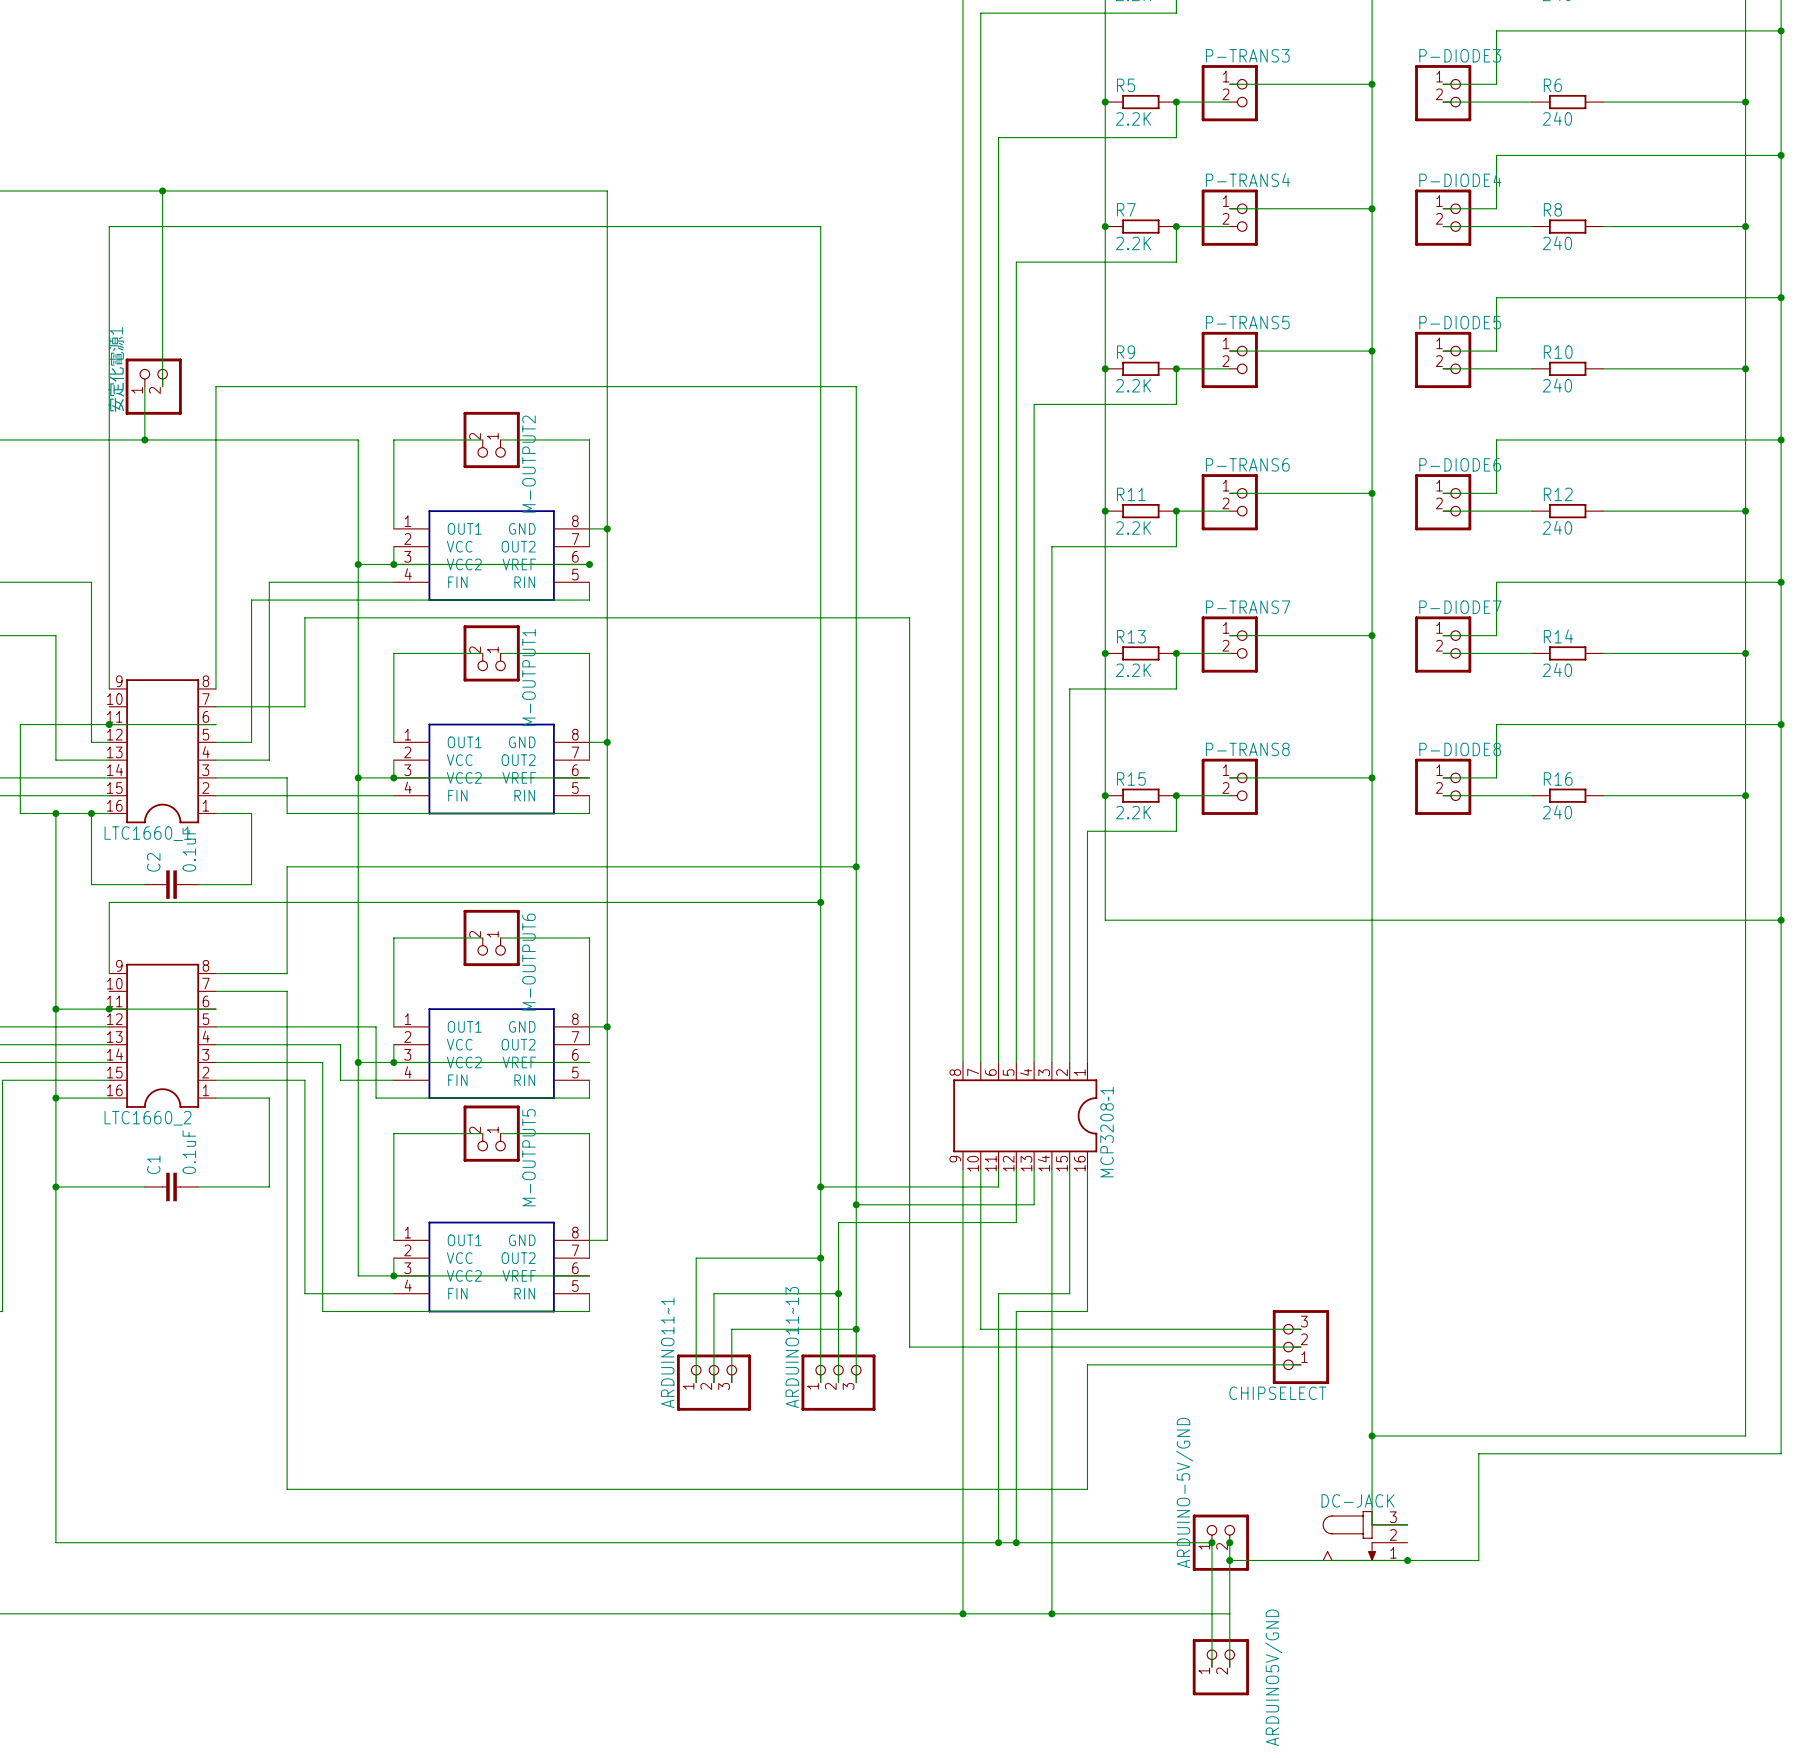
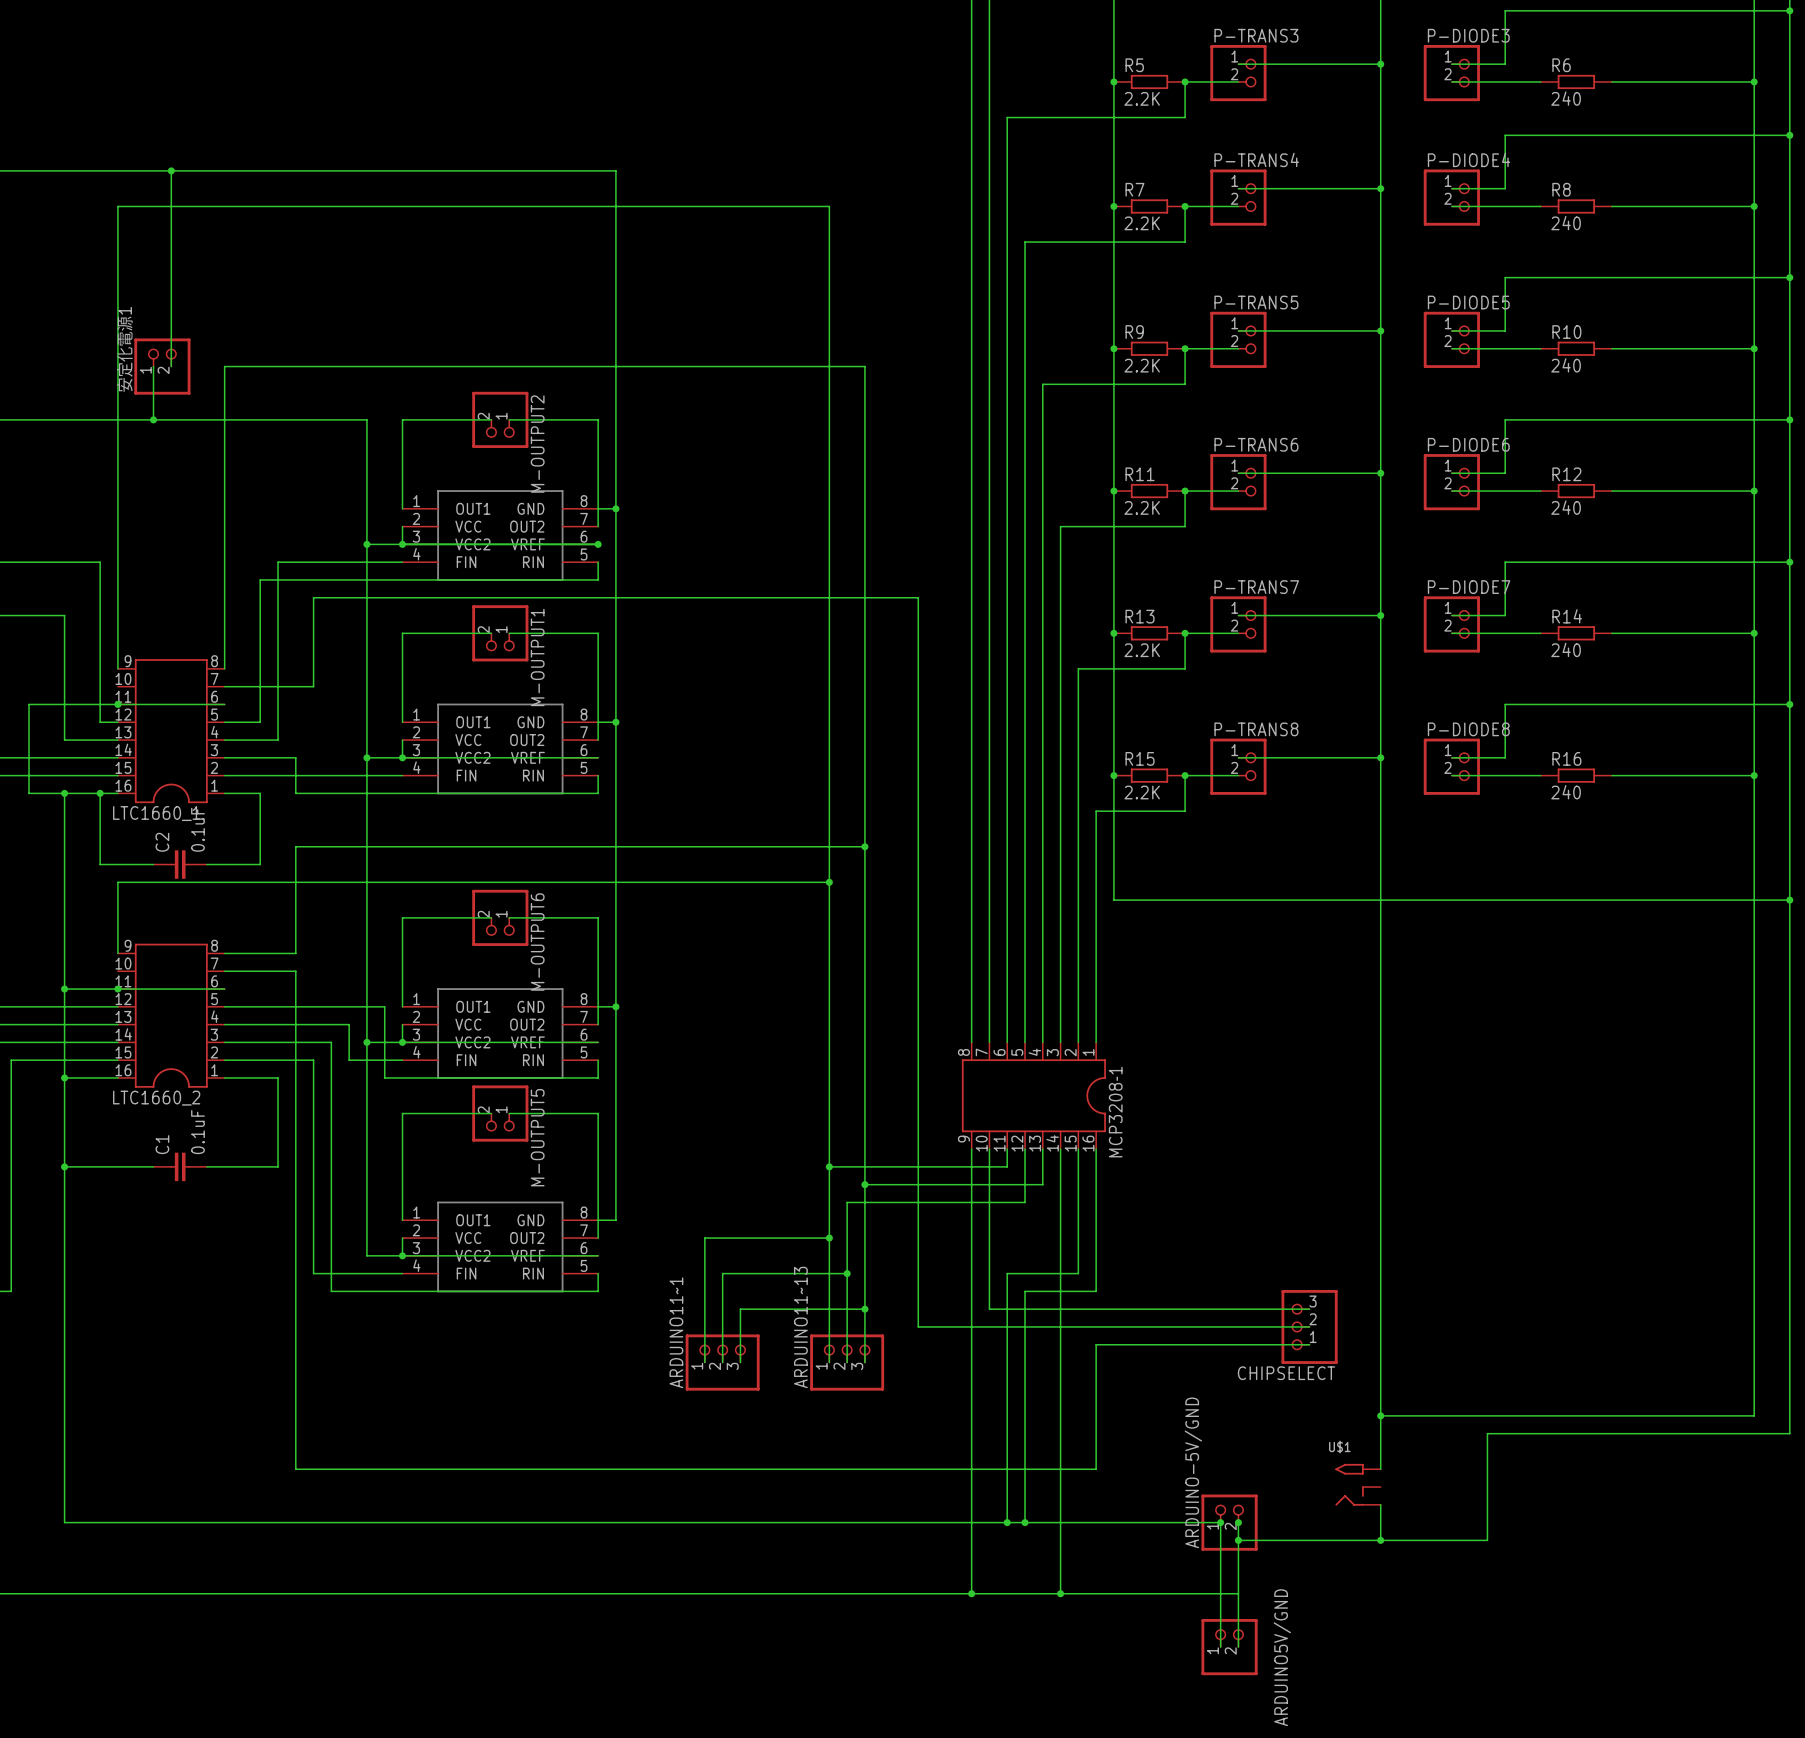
wire: (1372, 1489) (1372, 1524) (1407, 1524) -> none
U$1: none -> (1358, 1484)
DC-JACK: (1365, 1536) -> none
junction position: (1407, 1560) -> (1380, 1540)

